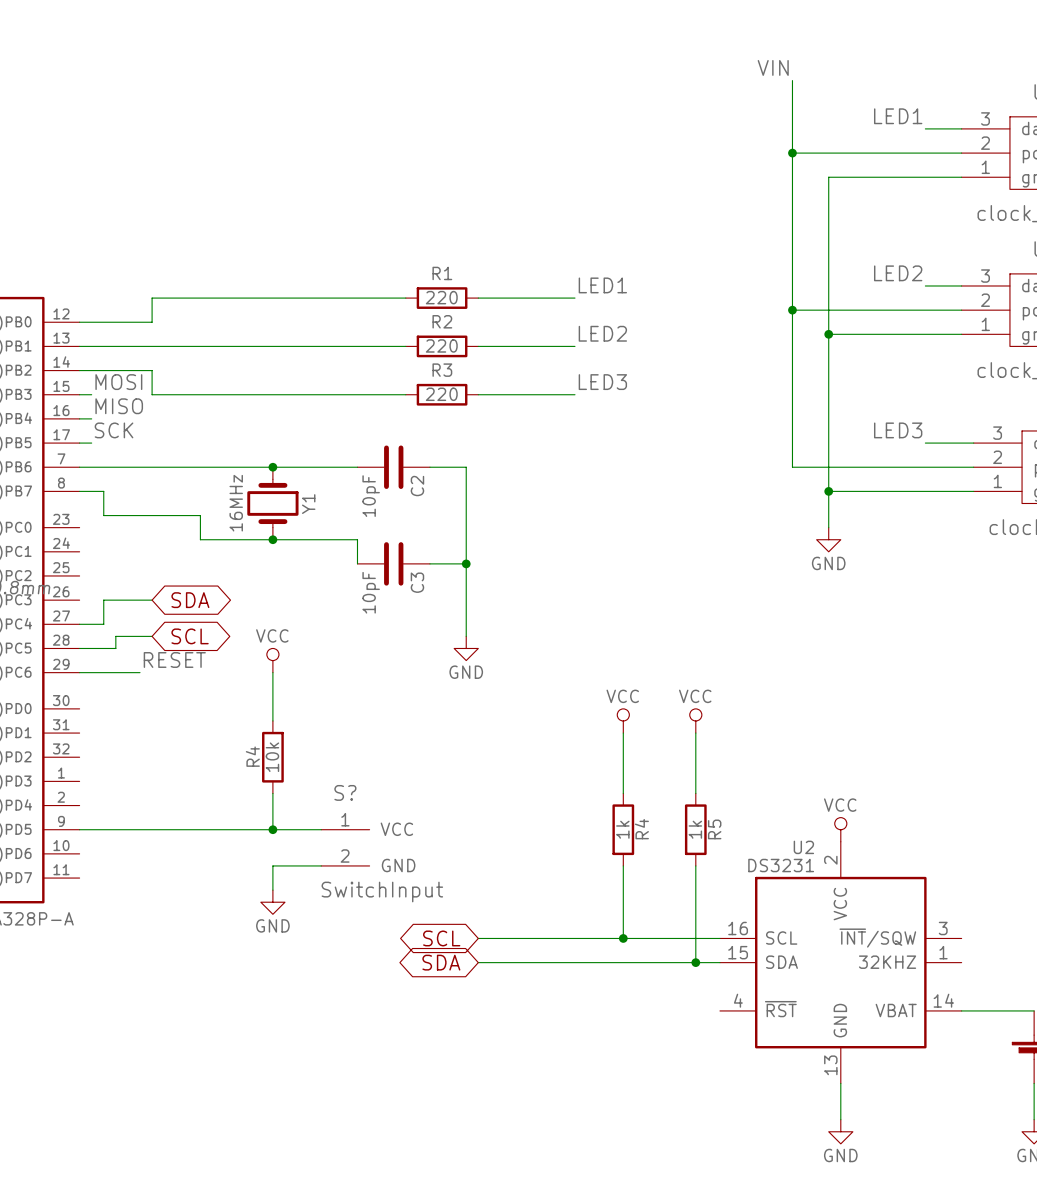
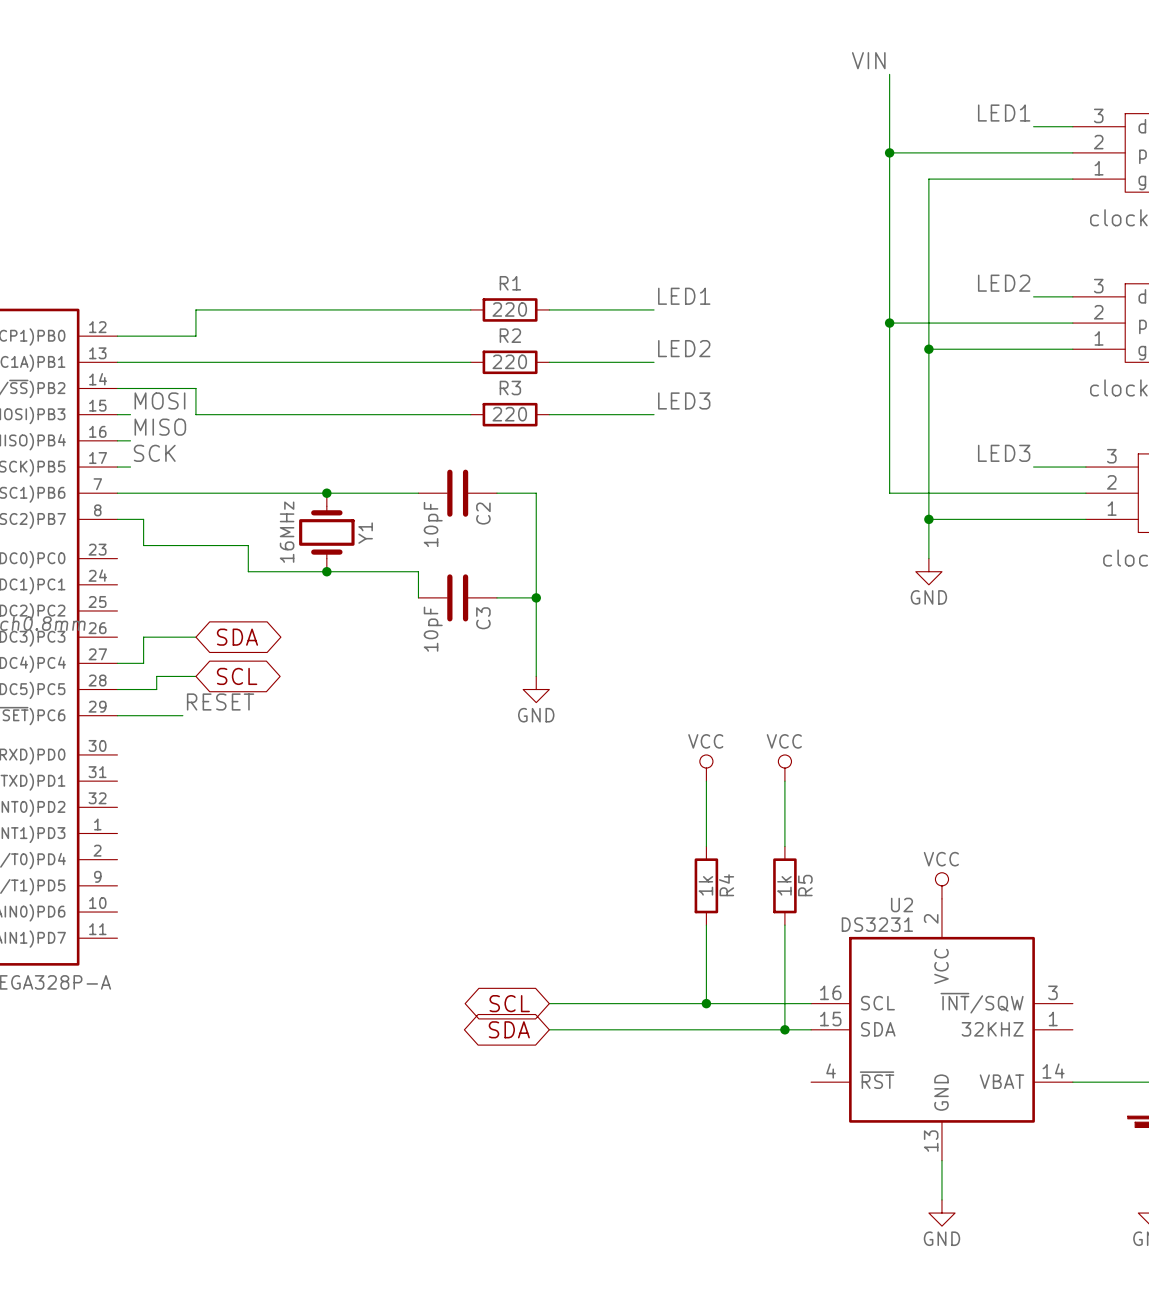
power symbol: VCC (272, 660) -> none
wire: (272, 672) (272, 720) -> none
R4: 10k (272, 757) -> none
wire: (272, 793) (272, 829) -> none
wire: (79, 829) (321, 829) -> none
junction: (272, 829) -> none
S?: SwitchInput (345, 847) -> none
wire: (321, 865) (272, 865) (272, 890) -> none
power symbol: GND (272, 902) -> none

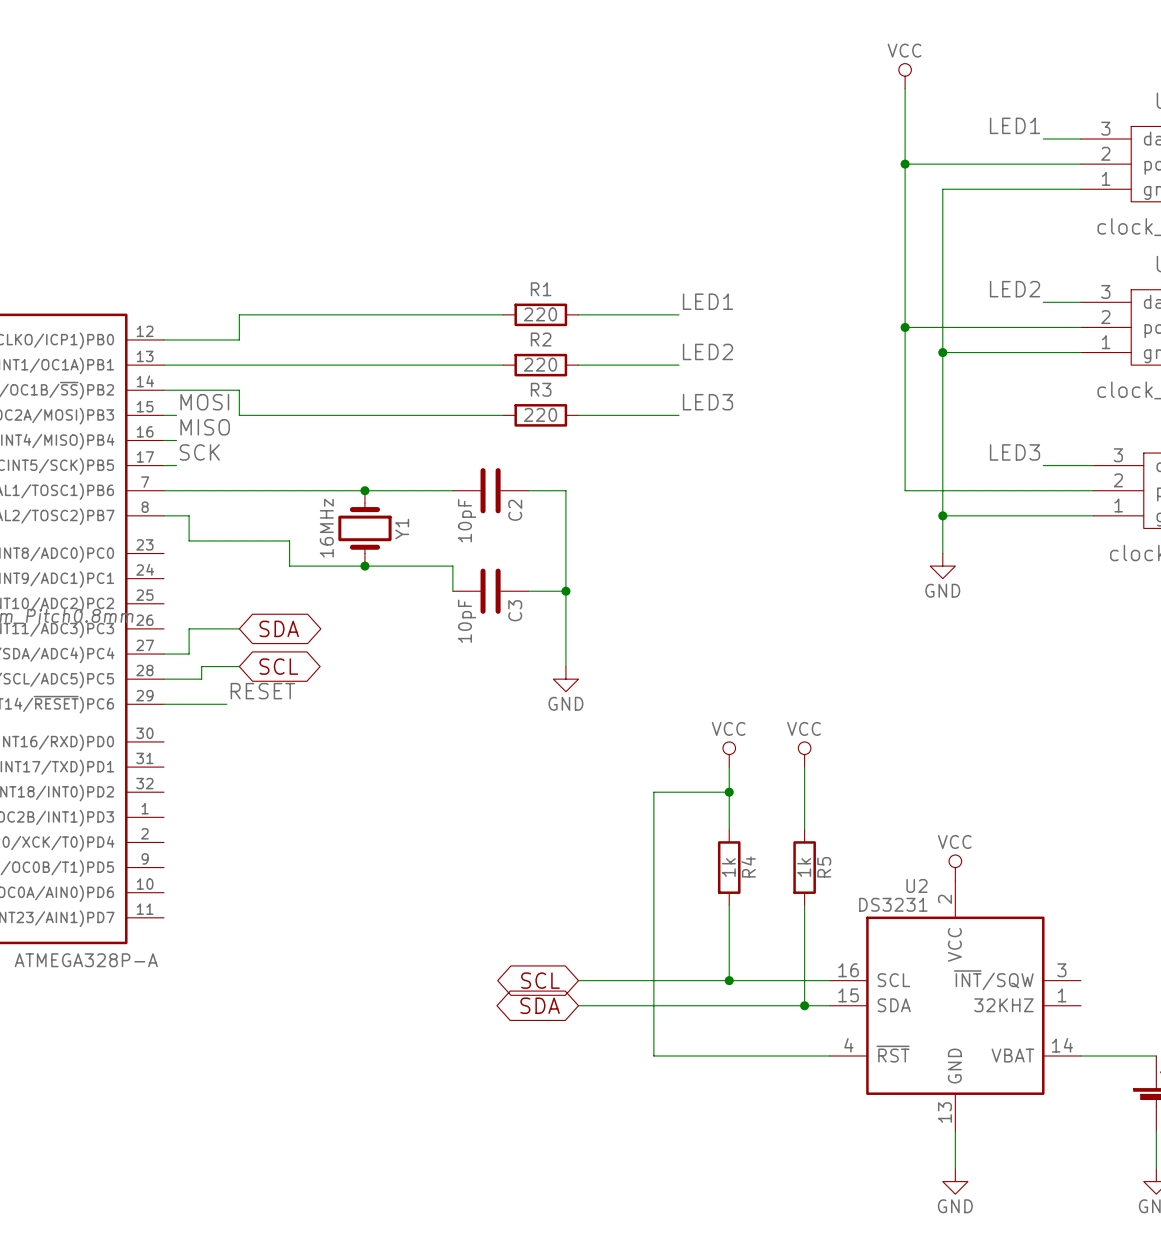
label: VIN (868, 60) -> none
power symbol: none -> VCC (905, 76)
wire: none -> (729, 792) (653, 792) (653, 1056) (829, 1056)
junction: none -> (729, 792)

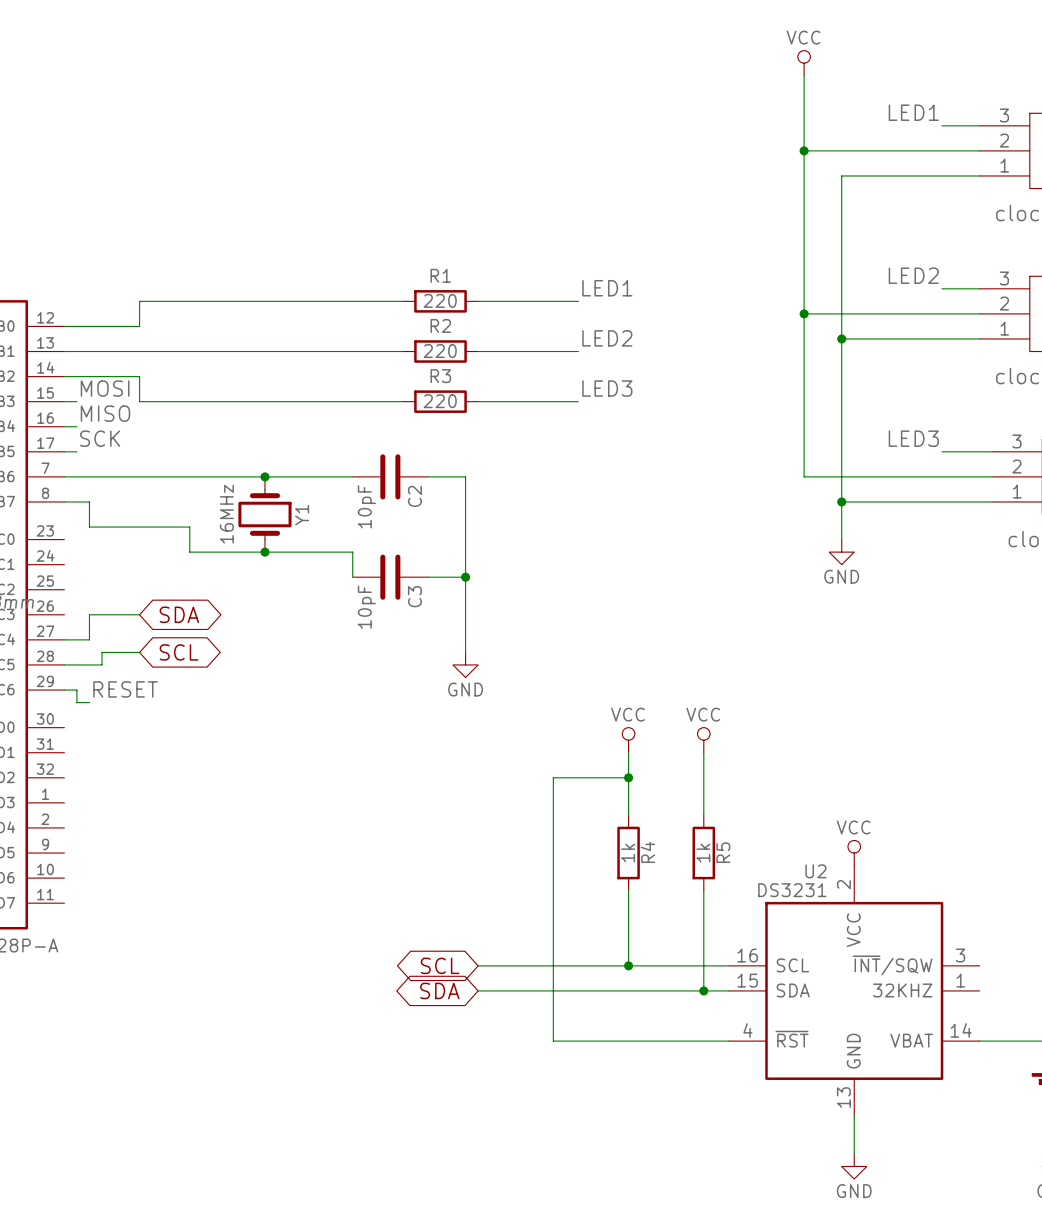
label position: RESET (262, 691) -> RESET (125, 689)
wire: (176, 704) (226, 704) -> (76, 690) (76, 702) (89, 702)

